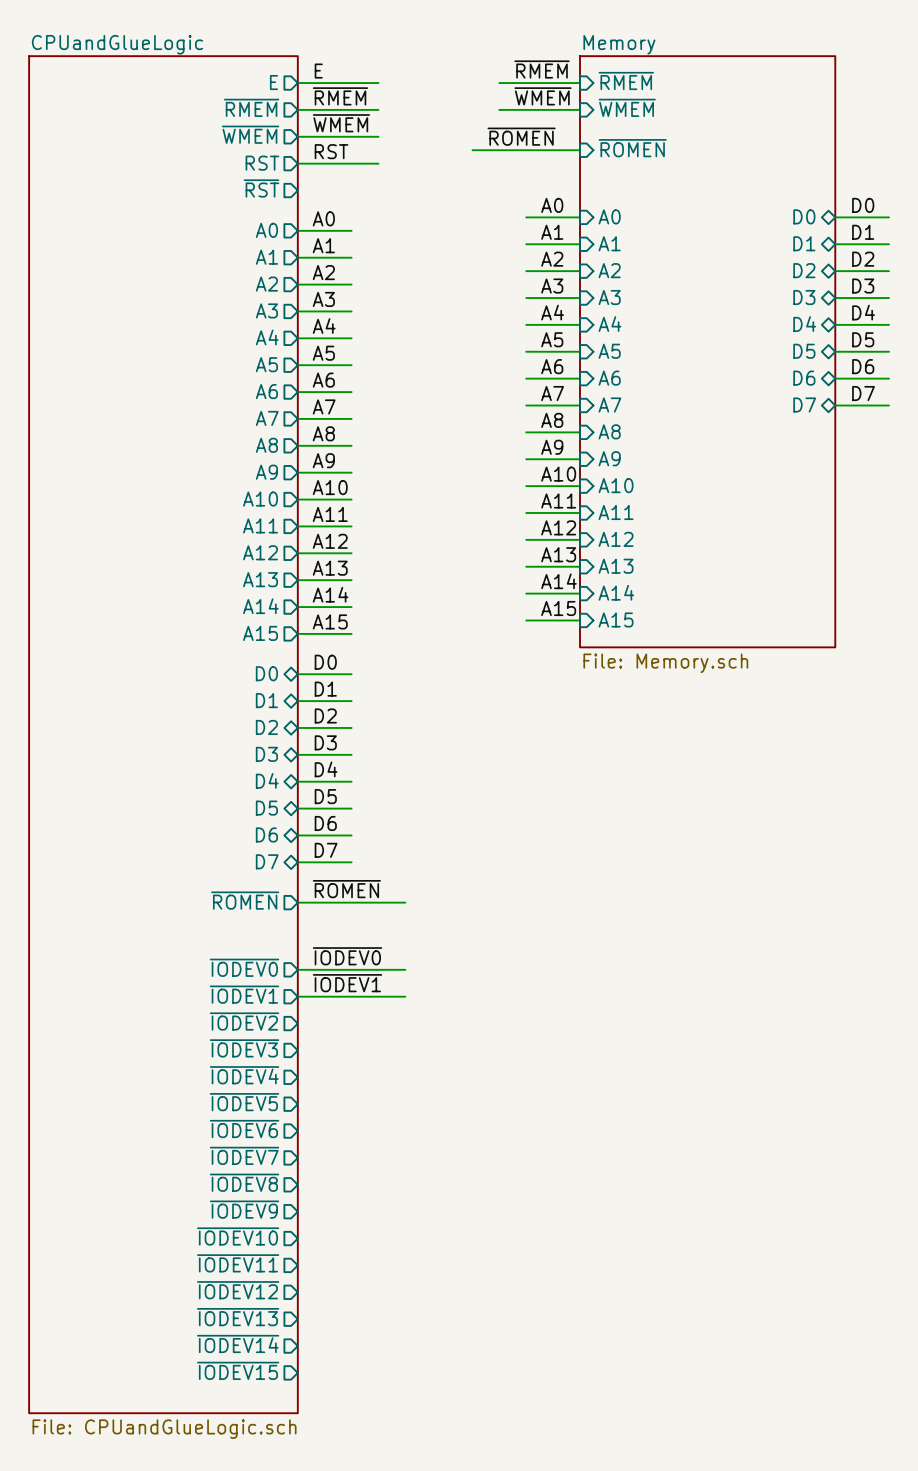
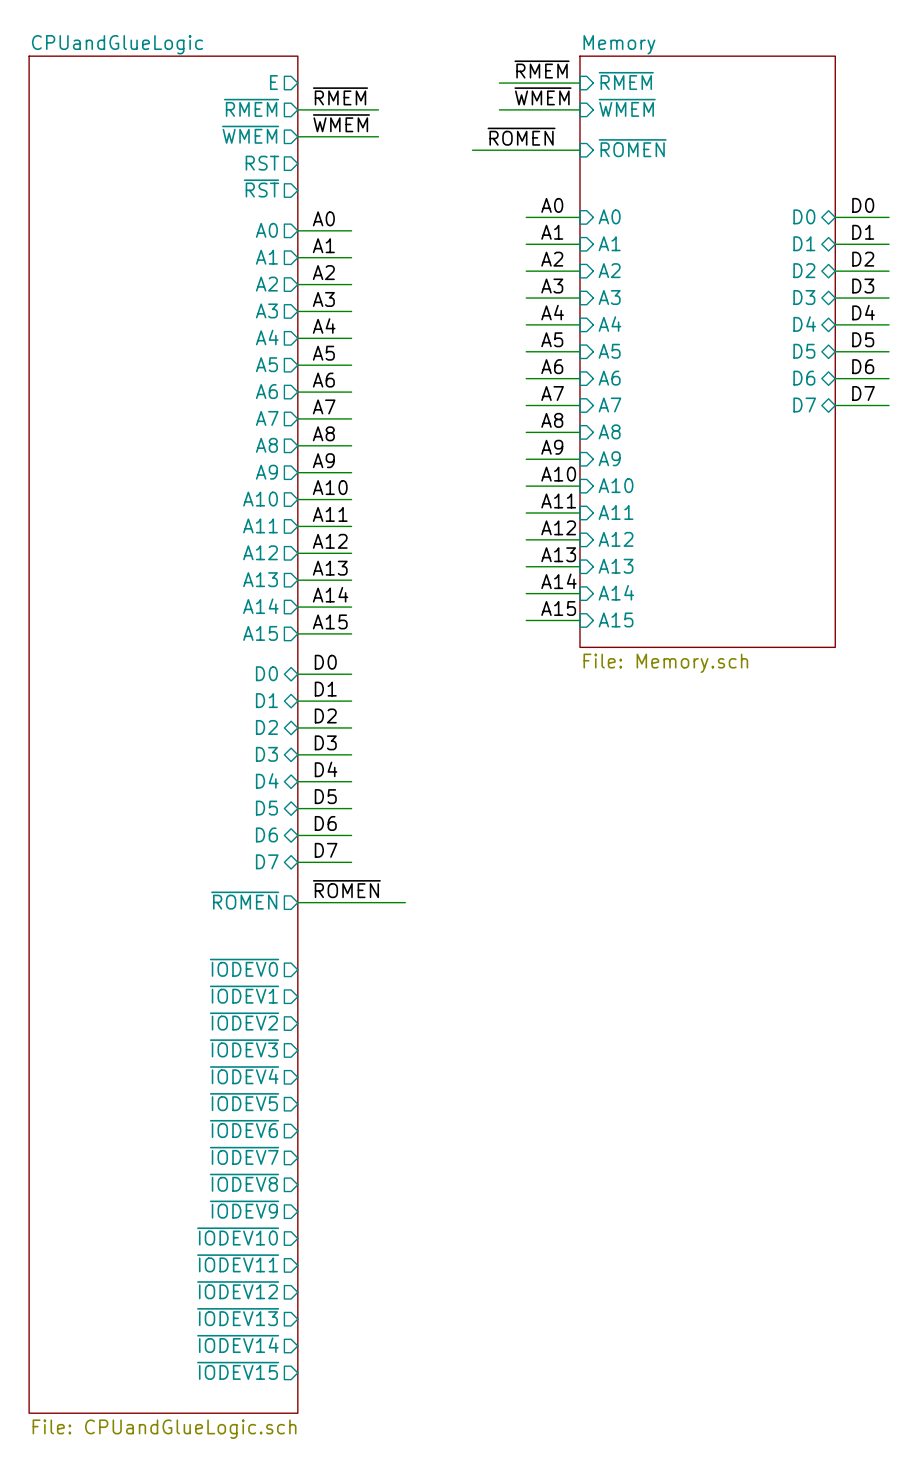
label: E (318, 71) -> none
wire: (297, 83) (378, 83) -> none
label: RST (331, 151) -> none
wire: (297, 163) (378, 163) -> none
label: ~{IODEV0} (347, 956) -> none
wire: (297, 969) (405, 969) -> none
label: ~{IODEV1} (347, 983) -> none
wire: (297, 996) (405, 996) -> none

